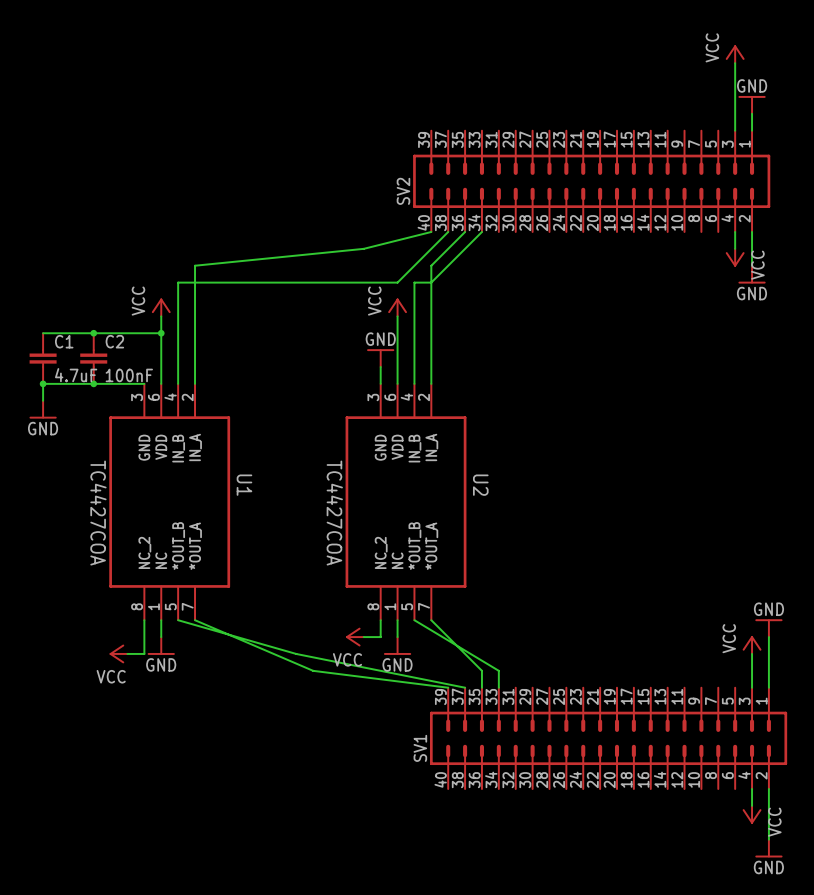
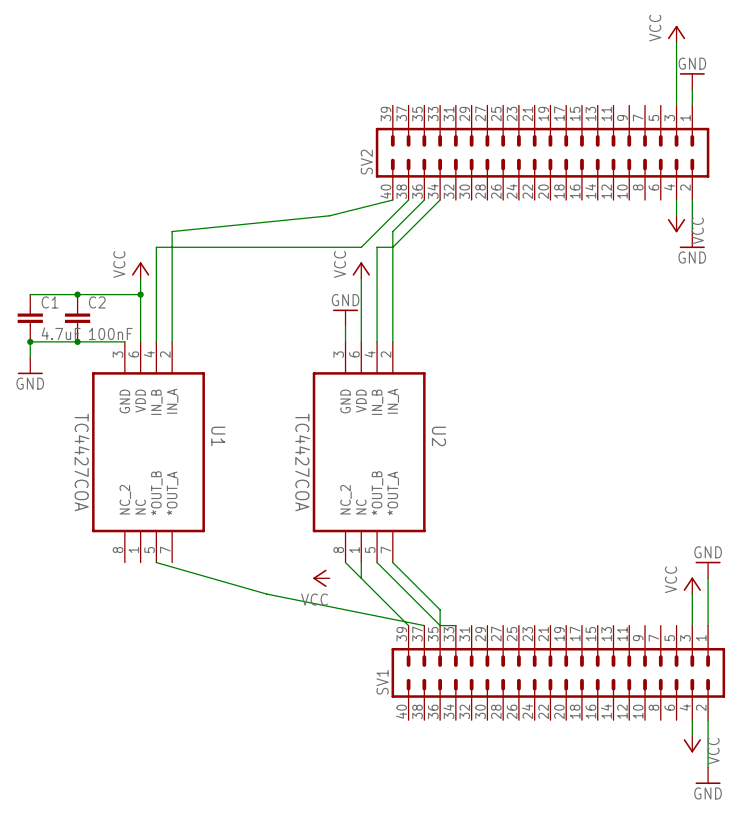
wire: (144, 620) (144, 653) (127, 653) -> none
wire: (161, 620) (161, 637) -> none
wire: (195, 620) (313, 670) (448, 687) -> none
wire: (380, 620) (380, 637) (363, 637) -> (345, 562) (408, 625)
wire: (414, 620) (498, 670) (498, 687) -> (377, 562) (440, 625) (455, 625)
power symbol: GND (161, 645) -> none
power symbol: GND (397, 645) -> none
power symbol: VCC (118, 653) -> none

